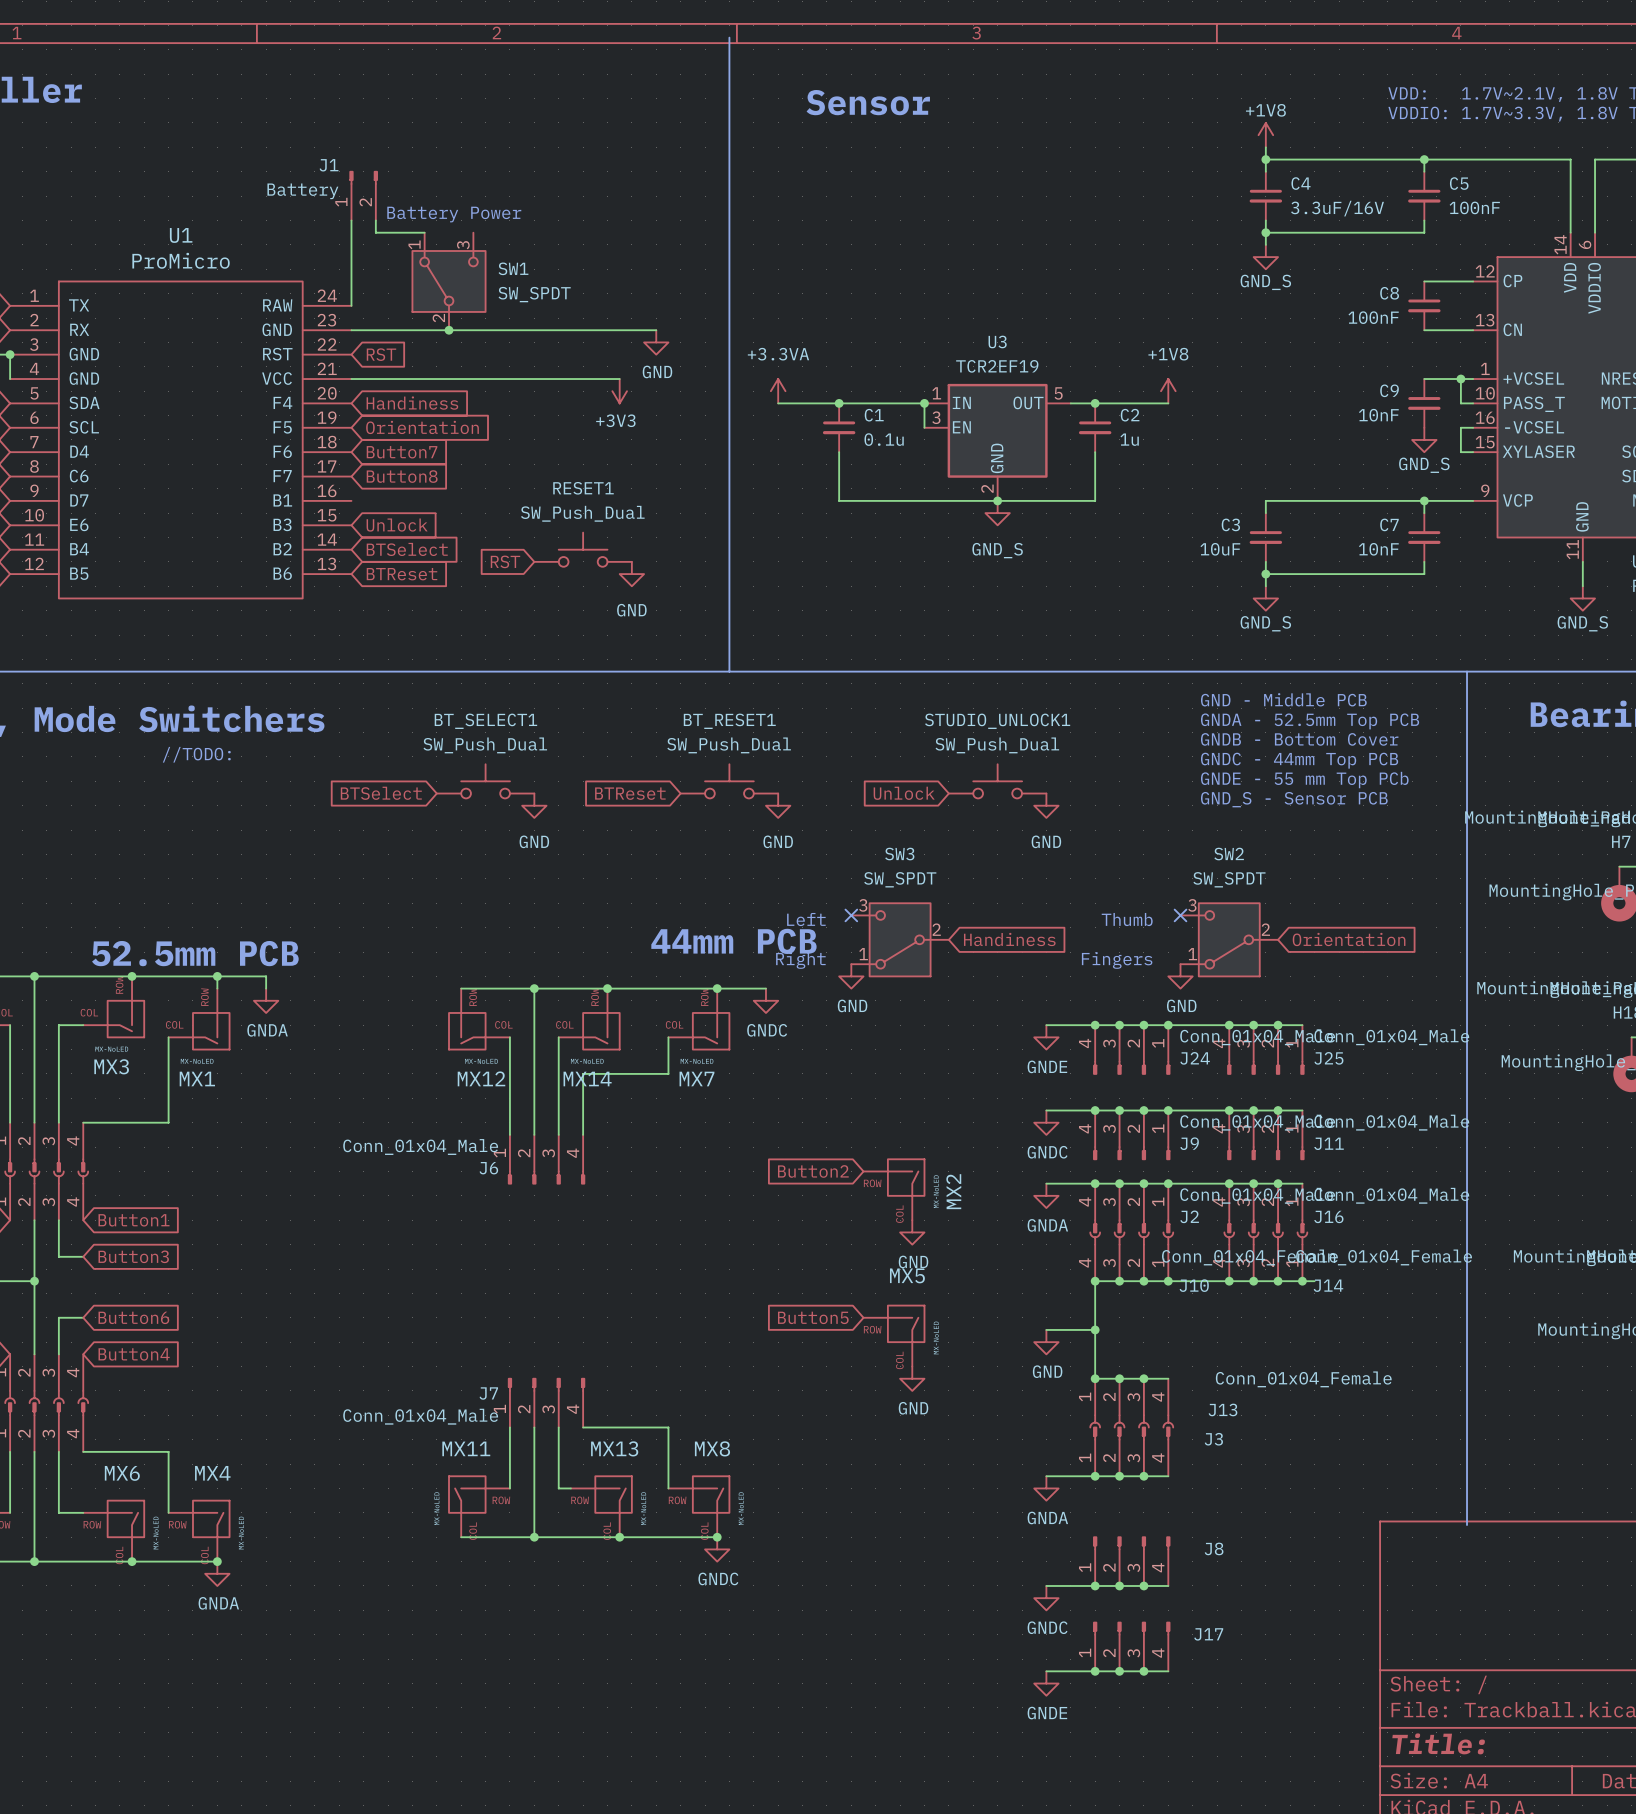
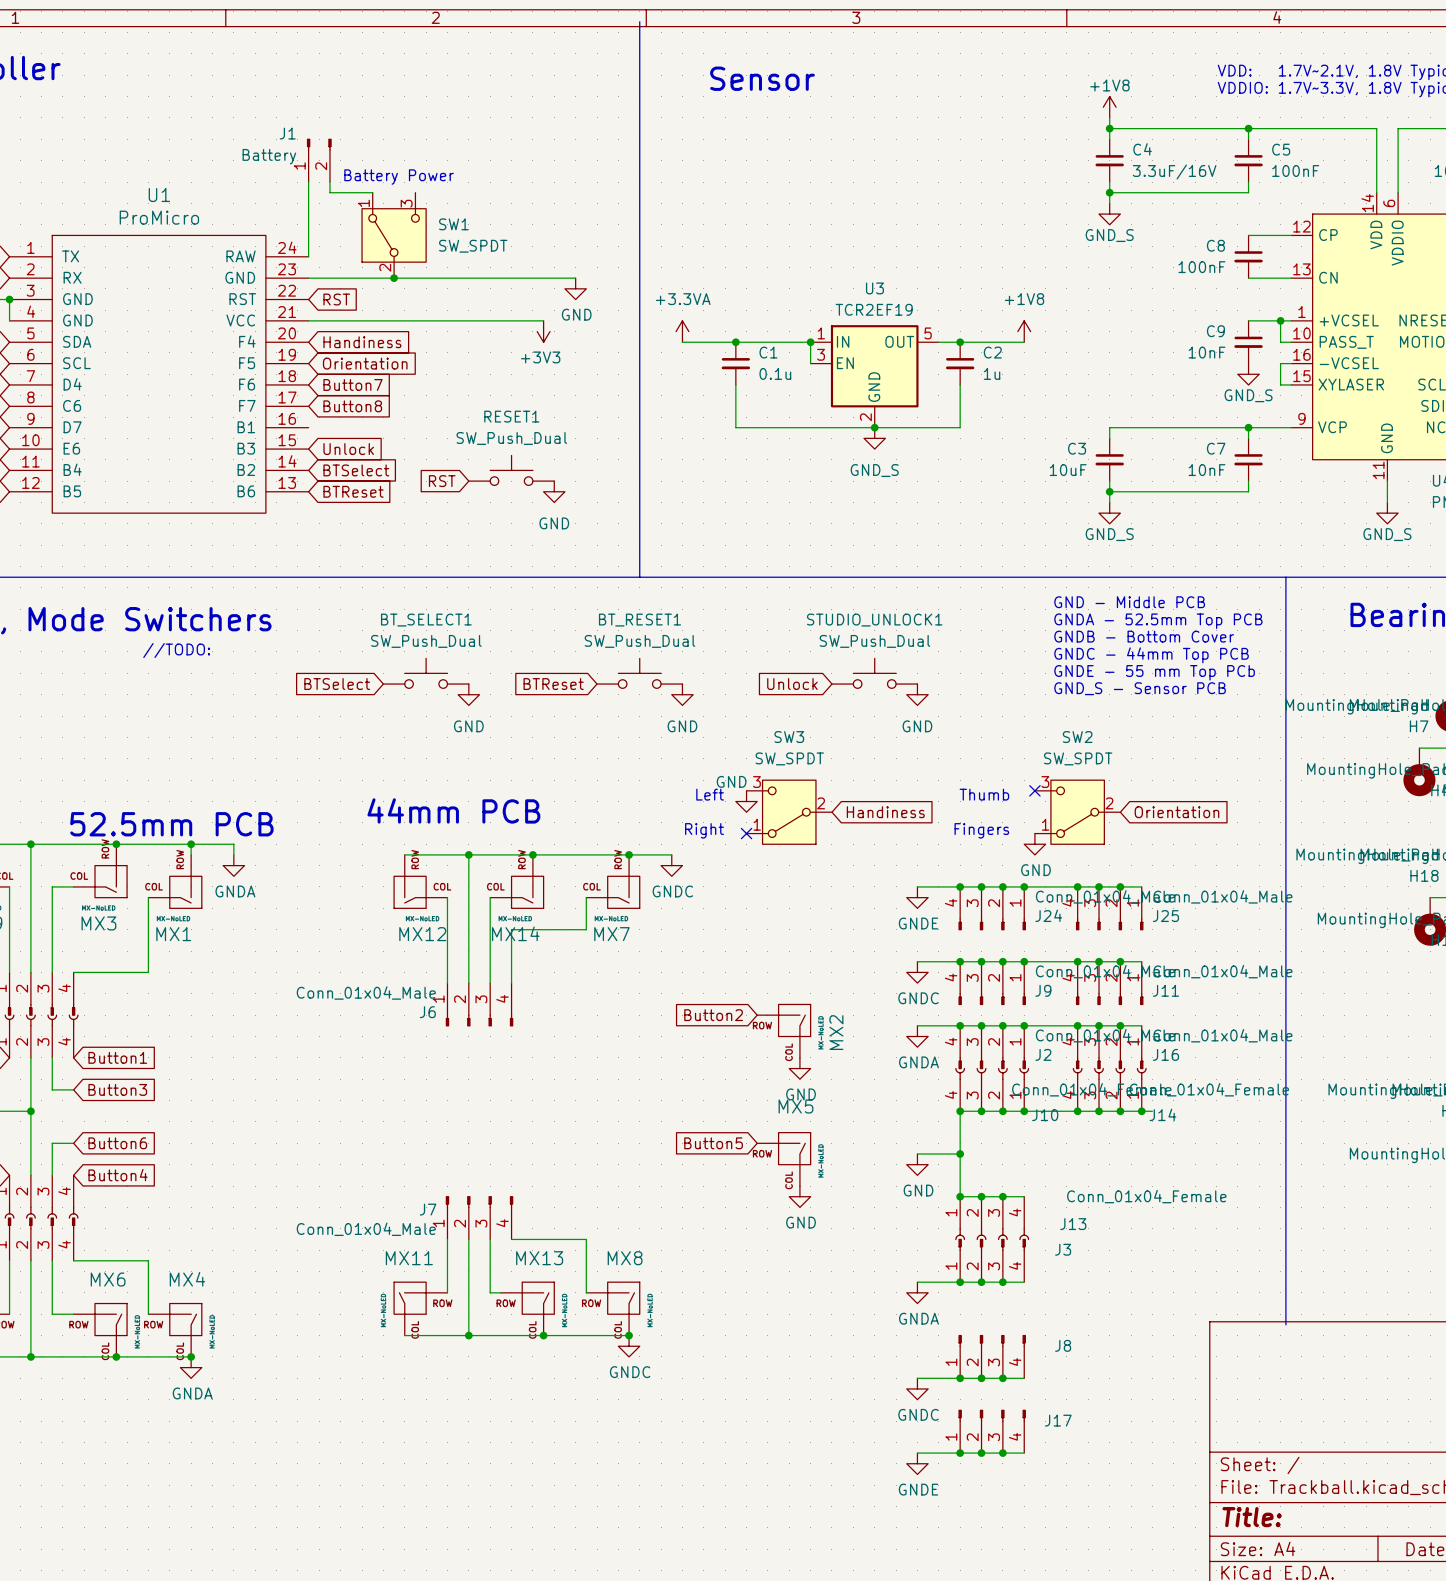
no-connect mark position: (851, 915) -> (746, 833)
text position: 44mm PCB (733, 941) -> 44mm PCB (453, 810)
power symbol position: GND (851, 976) -> GND (746, 801)
power symbol text position: GND (852, 1005) -> GND (731, 781)

